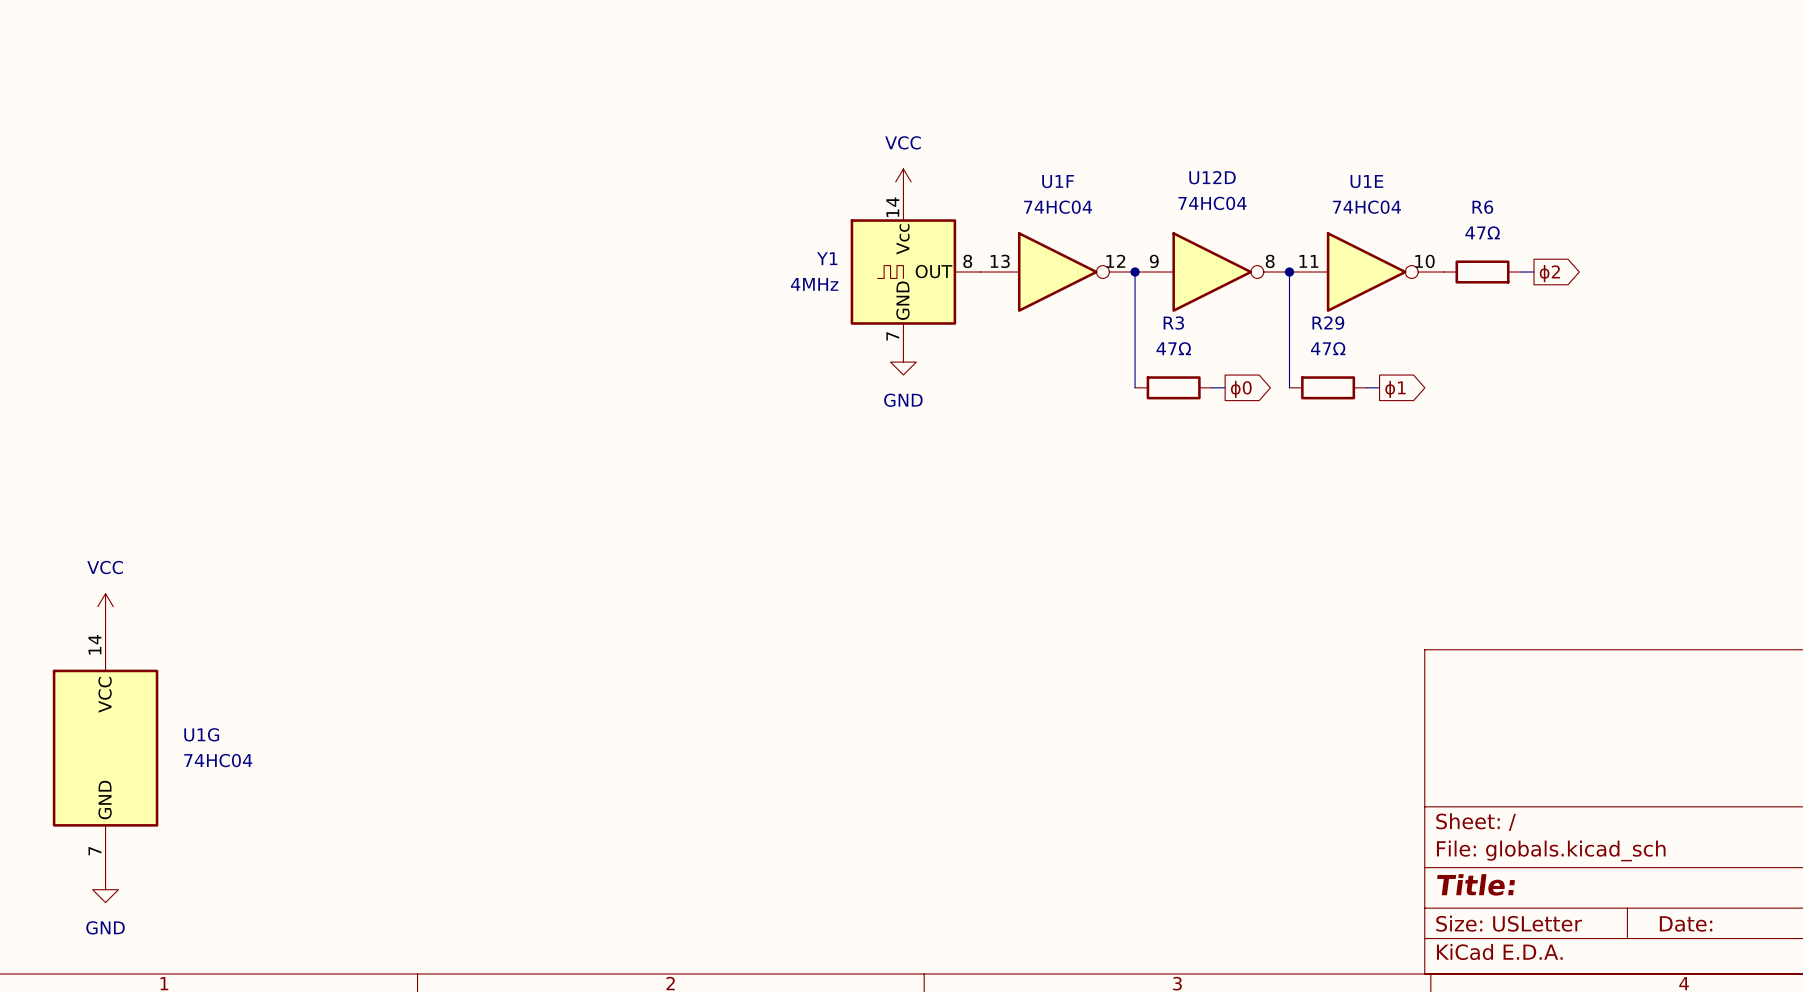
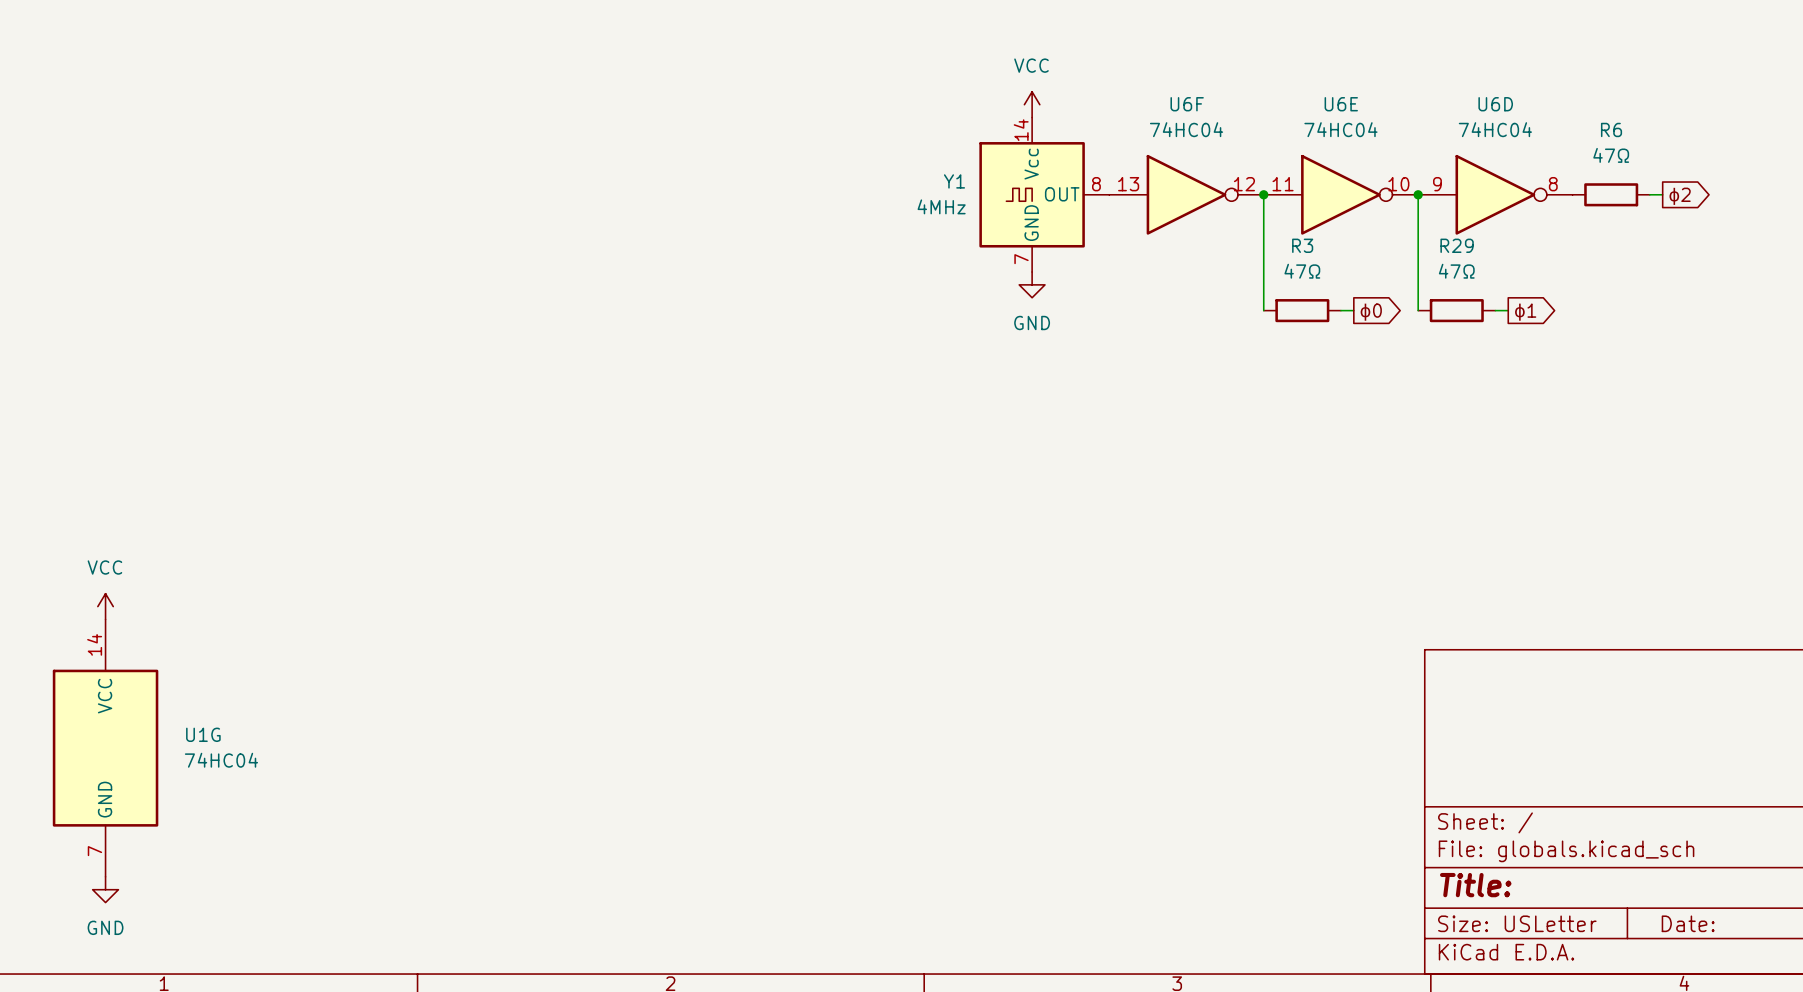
power symbol position: VCC (903, 181) -> VCC (1032, 104)
U6F: none -> 74HC04 (1186, 194)
junction: none -> (1263, 194)
U6E: none -> 74HC04 (1340, 194)
junction: none -> (1418, 194)
U6D: none -> 74HC04 (1495, 194)
Y1 position: (915, 272) -> (1044, 194)
U1F: 74HC04 (1057, 272) -> none
wire: (1135, 272) (1135, 387) -> (1263, 194) (1263, 310)
junction: (1135, 272) -> none
U12D: 74HC04 (1212, 272) -> none
wire: (1289, 272) (1289, 387) -> (1418, 194) (1418, 310)
junction: (1289, 272) -> none
U1E: 74HC04 (1366, 272) -> none
R6 position: (1482, 272) -> (1611, 194)
wire: (1521, 272) (1533, 272) -> (1649, 194) (1662, 194)
global label position: ϕ2 (1549, 273) -> ϕ2 (1679, 196)
power symbol position: GND (903, 362) -> GND (1032, 284)
R3 position: (1173, 387) -> (1302, 310)
wire: (1212, 387) (1225, 387) -> (1340, 310) (1353, 310)
R29 position: (1328, 387) -> (1456, 310)
wire: (1366, 387) (1379, 387) -> (1495, 310) (1508, 310)
global label position: ϕ0 (1241, 389) -> ϕ0 (1370, 312)
global label position: ϕ1 (1395, 389) -> ϕ1 (1525, 312)

